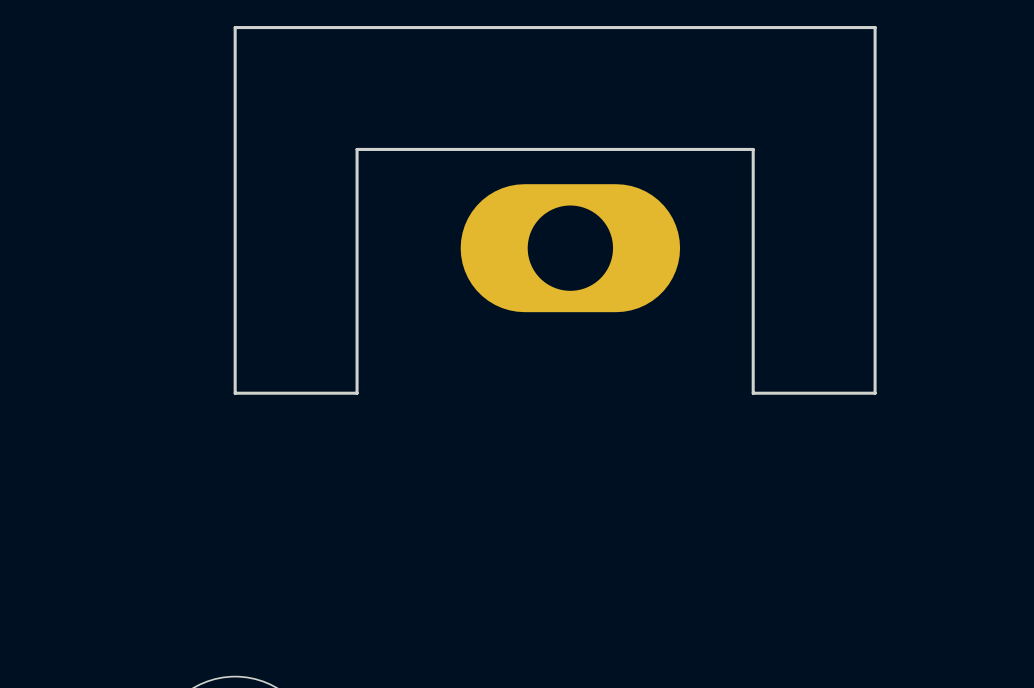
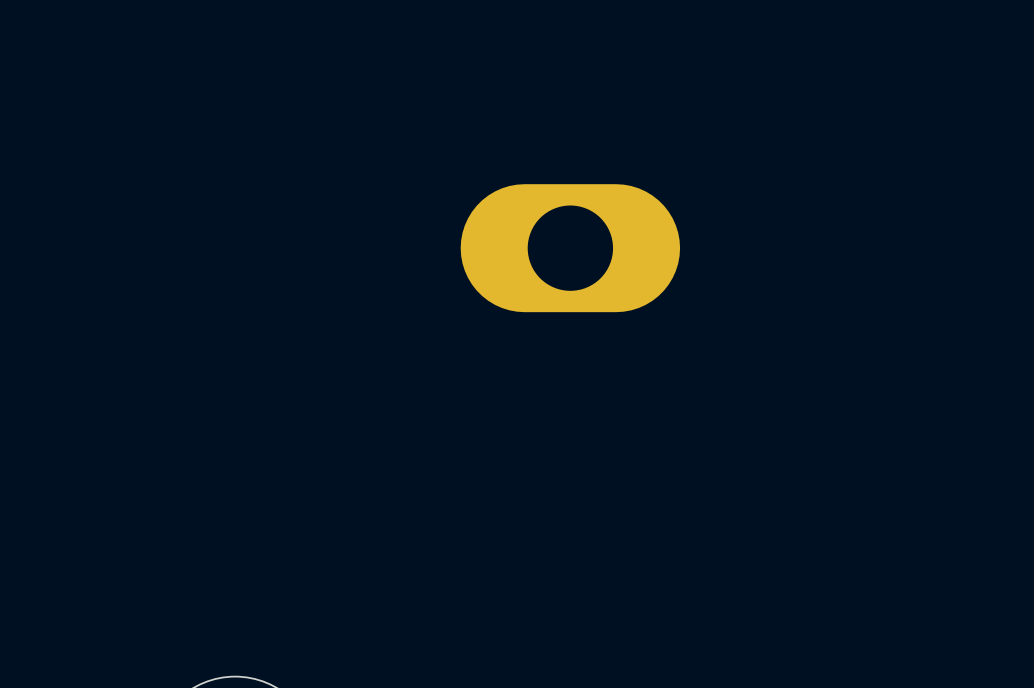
board edge: (875, 27) (875, 393) (753, 393) (753, 149) (357, 149) (357, 393) (235, 393) (235, 27) (875, 27) -> none

